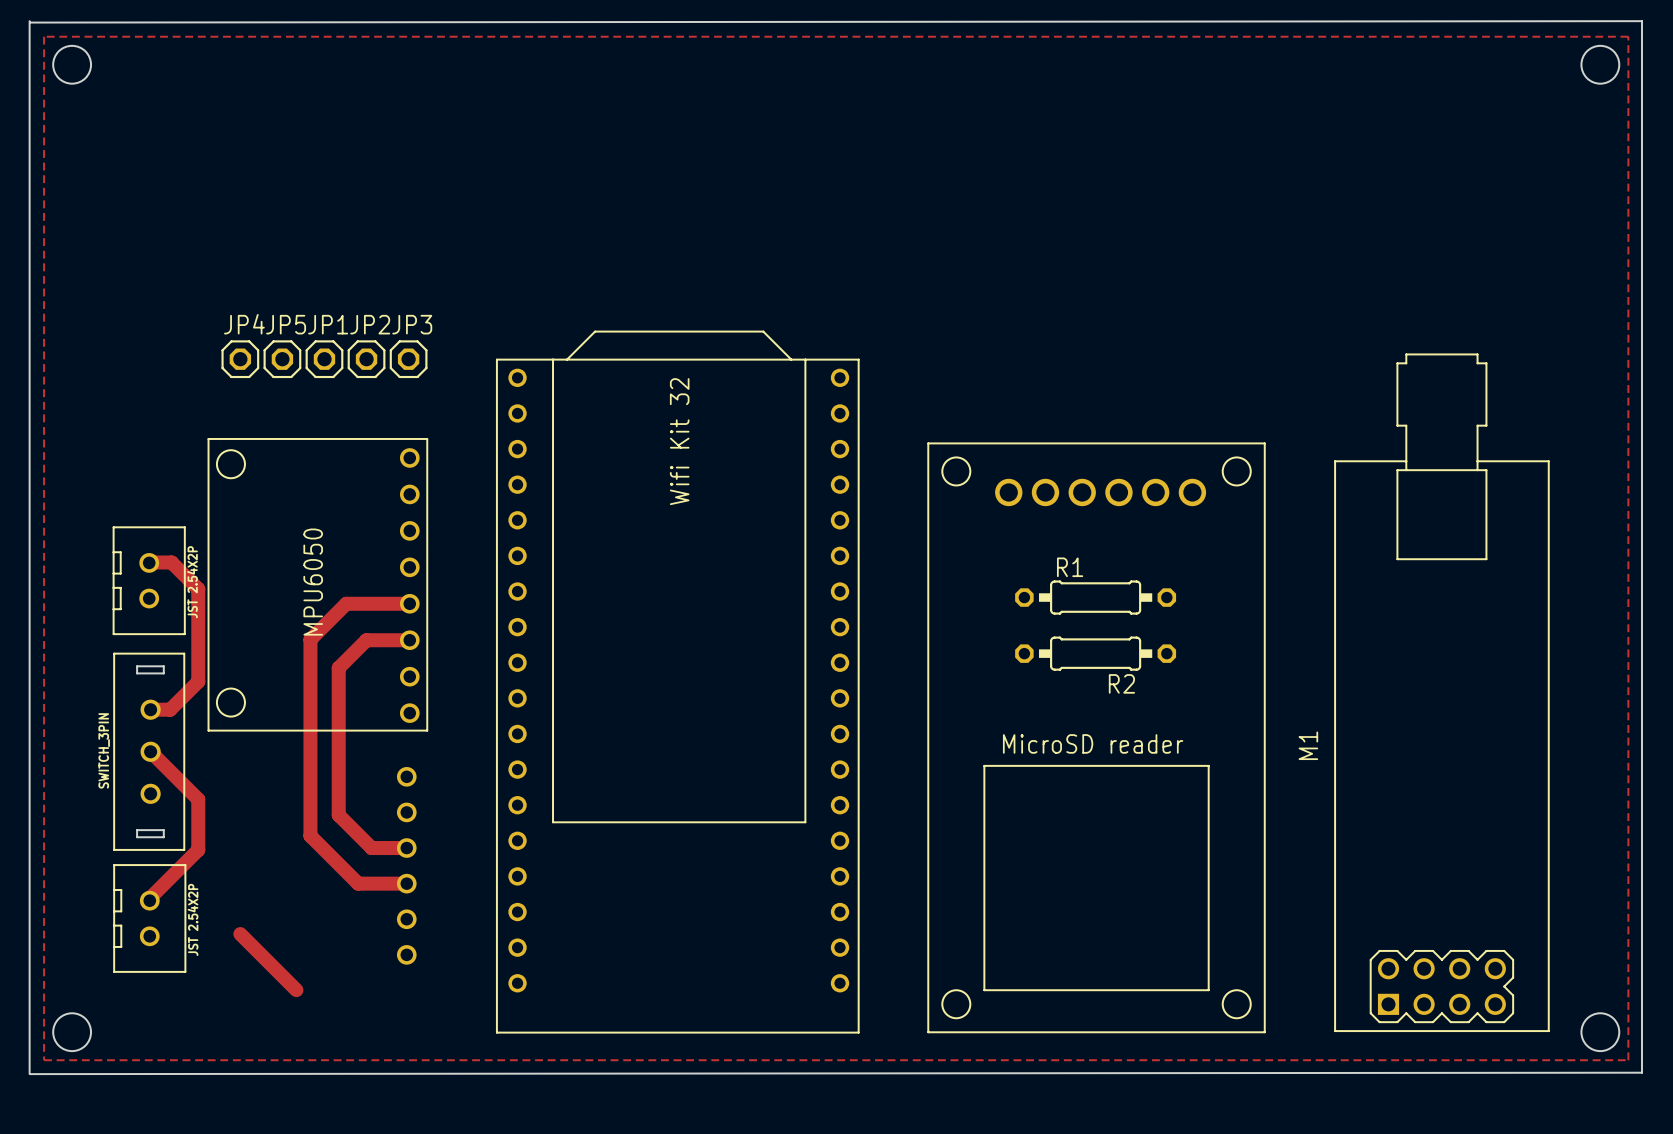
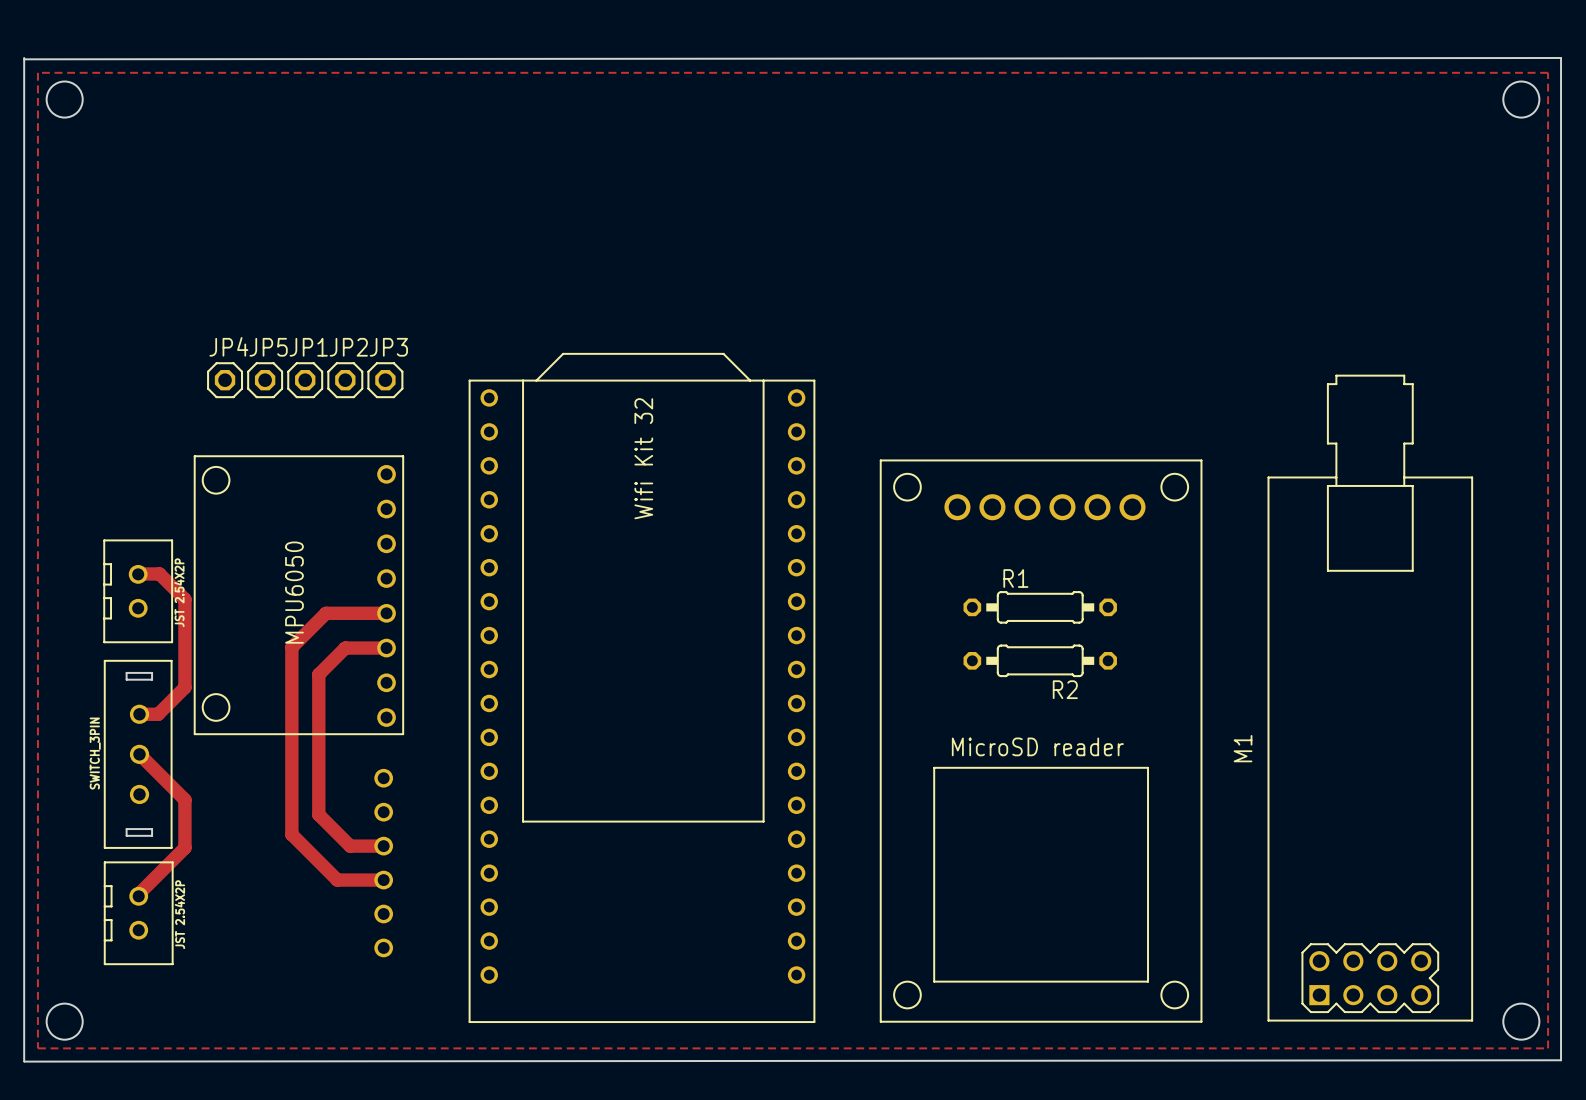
top track: (240, 934) (296, 990) -> none

